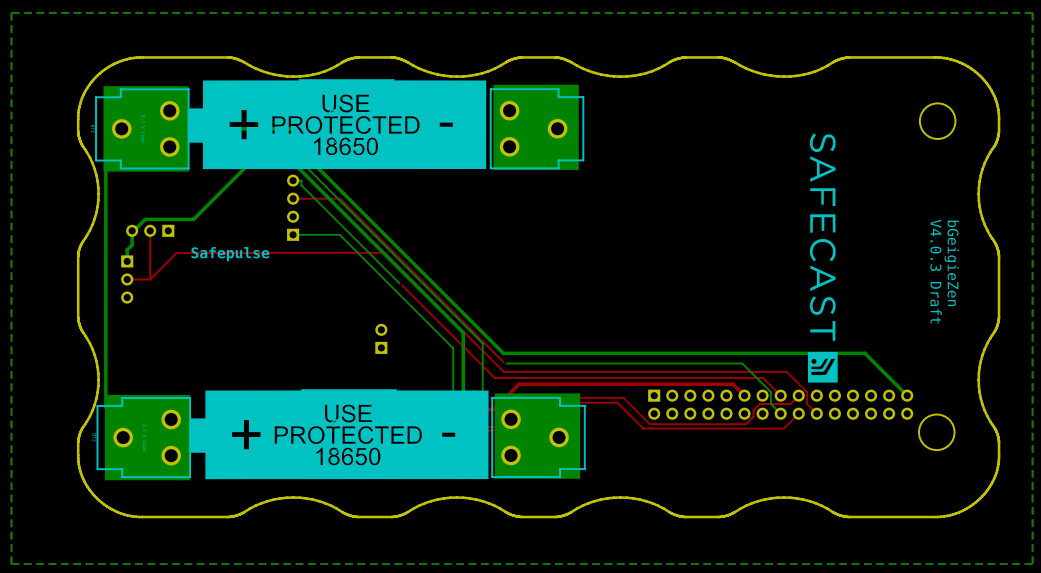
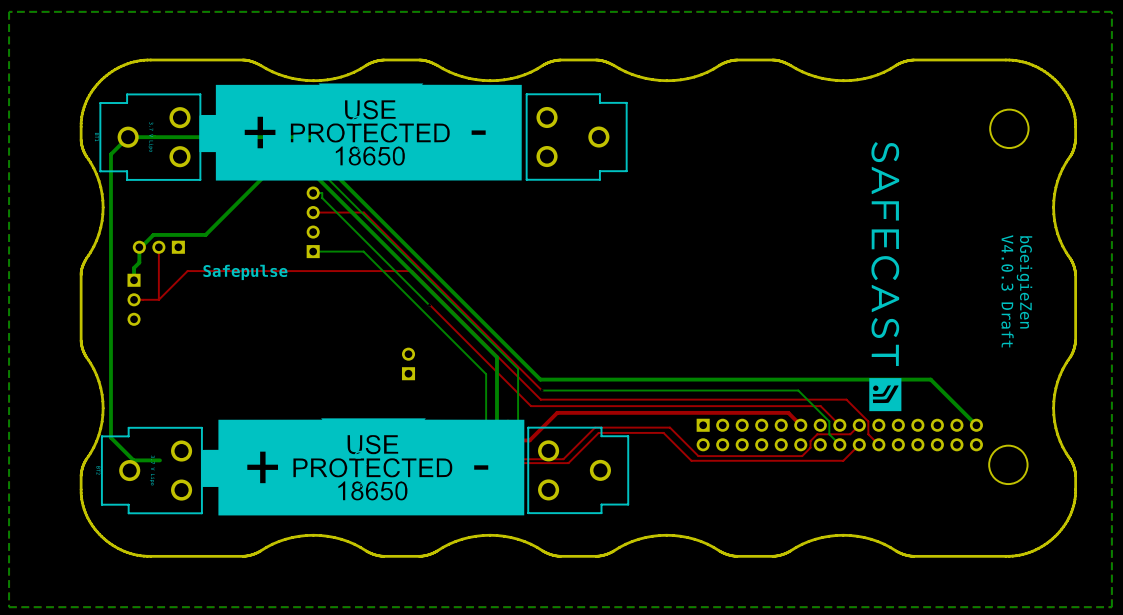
part footprint: [95, 84, 585, 172] -> [99, 93, 628, 181]
part footprint: [96, 393, 586, 481] -> [101, 426, 630, 515]

